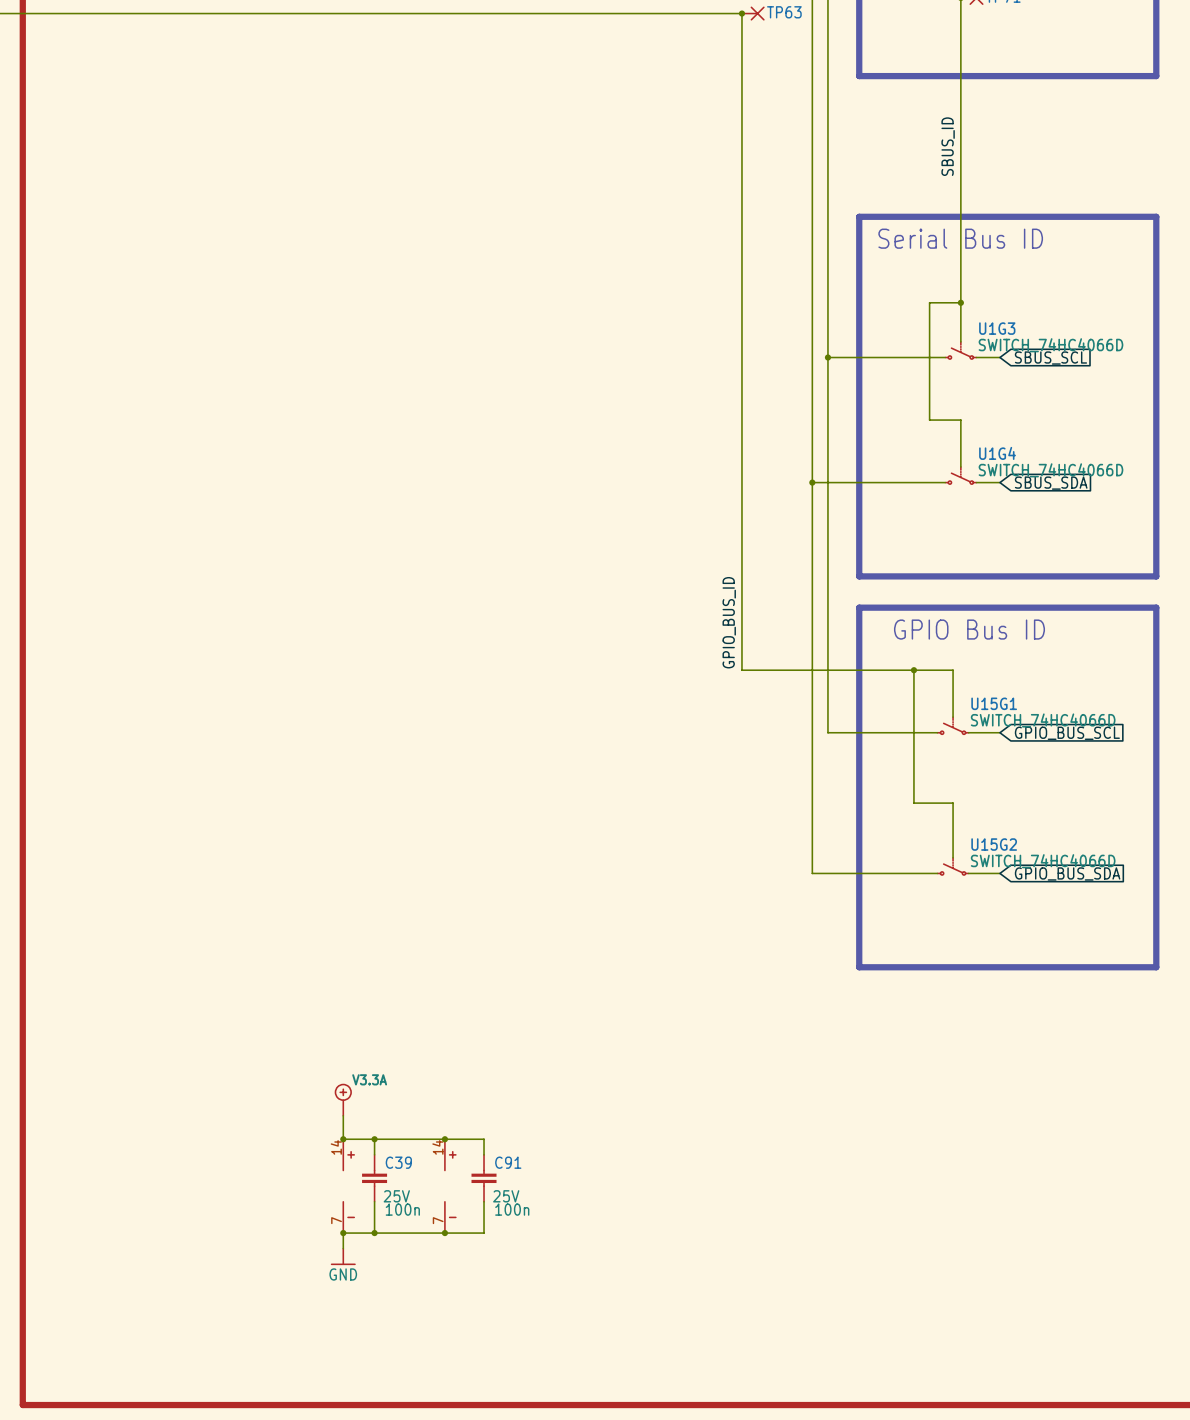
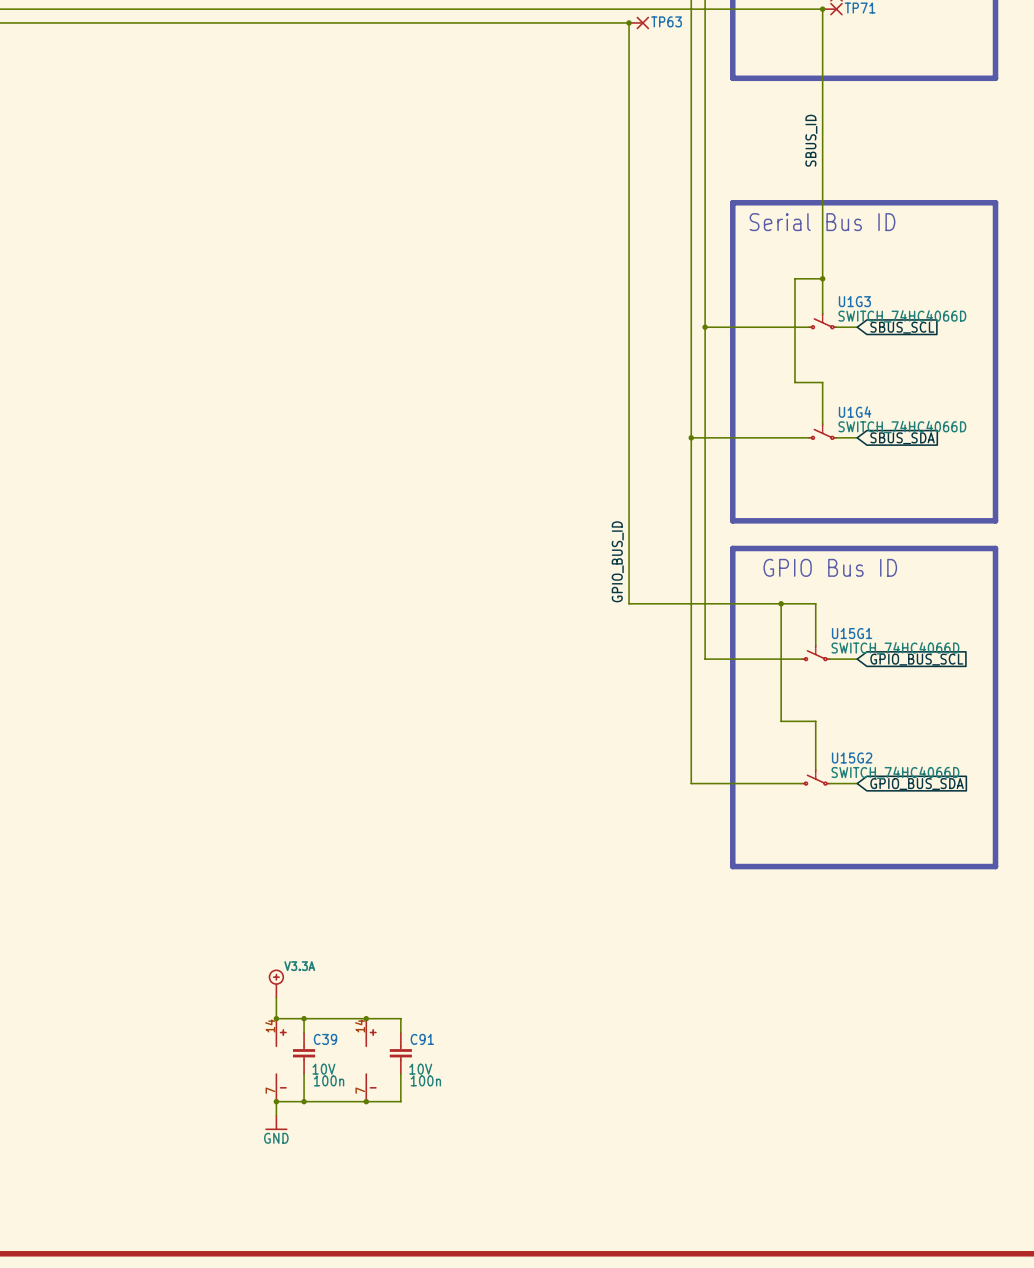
C39 text: 25V (396, 1196) -> 10V (323, 1069)
C91 text: 25V (506, 1196) -> 10V (420, 1069)

